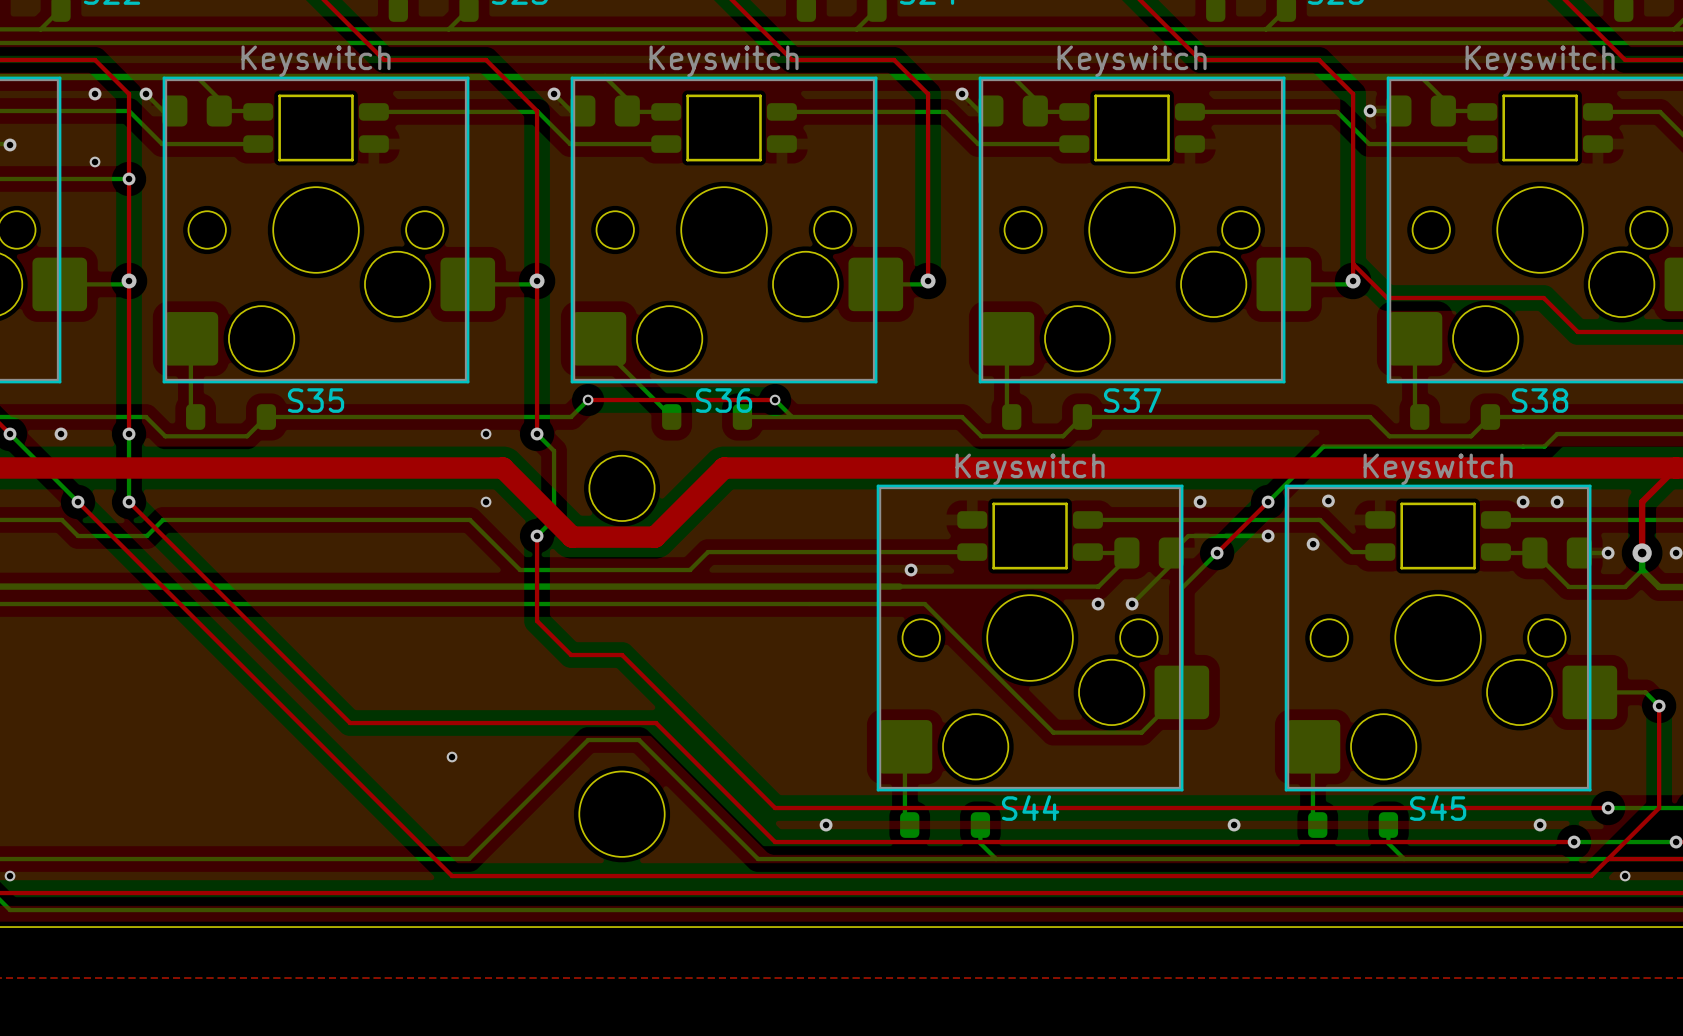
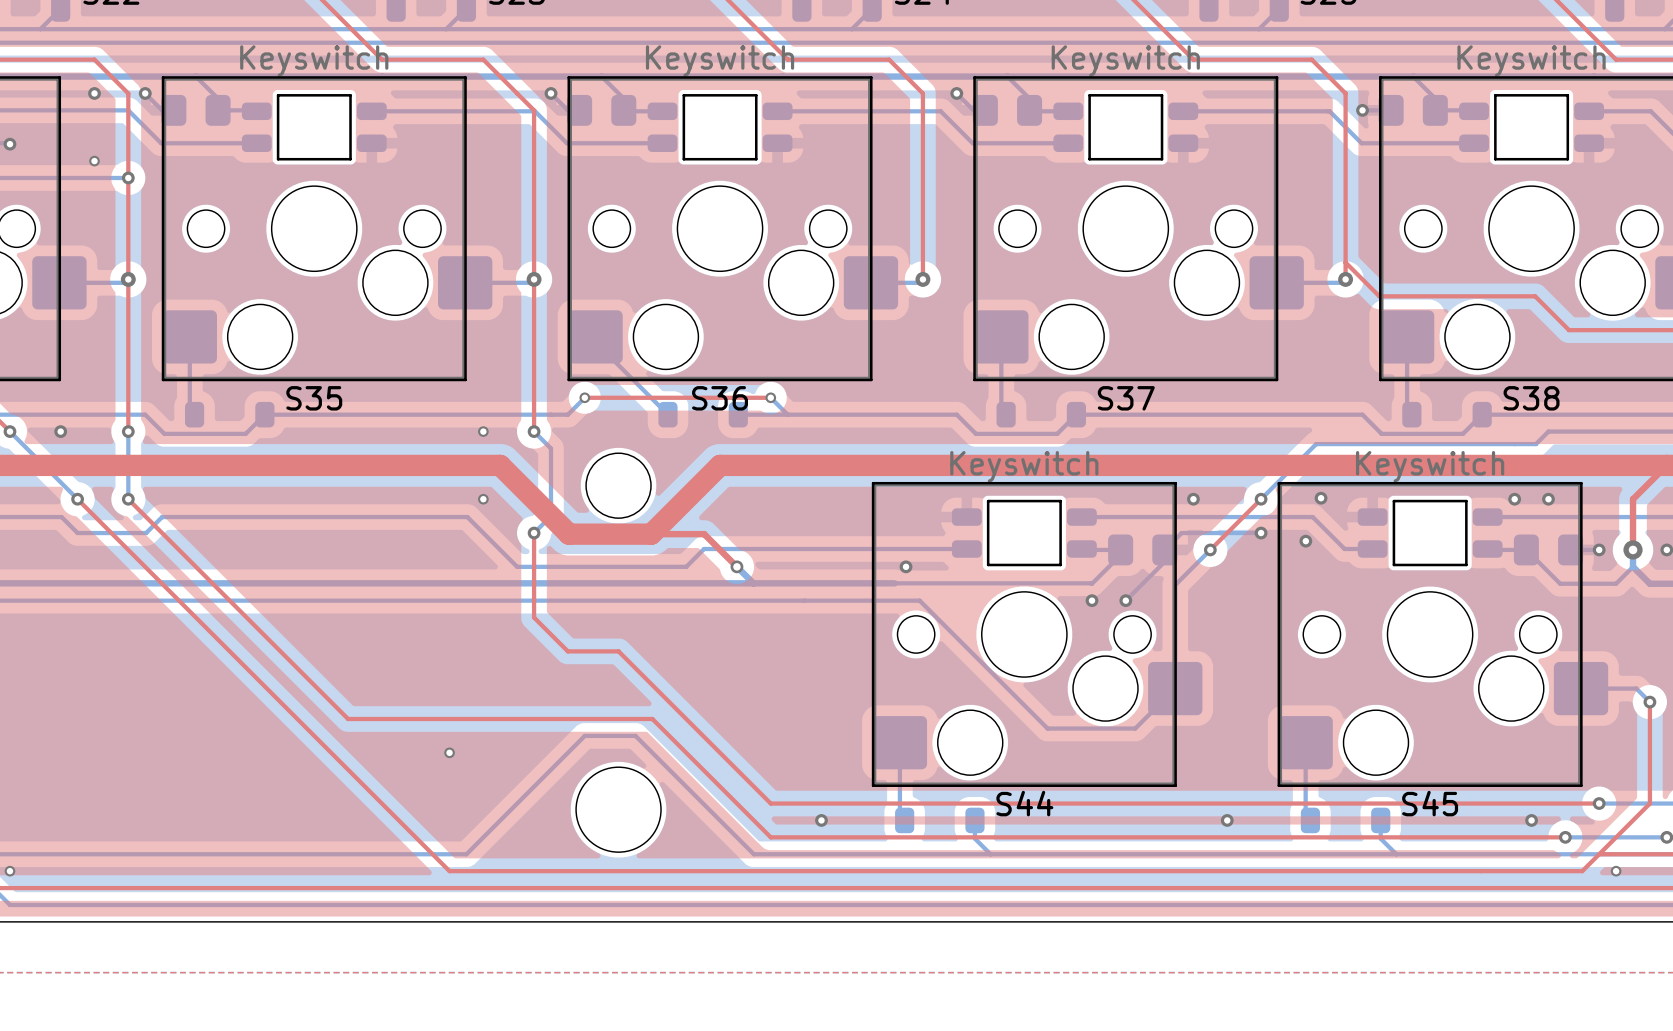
top track: none -> (651, 534) (704, 534) (736, 566)
bottom track: none -> (736, 566) (753, 583)
via: none -> (736, 566)

